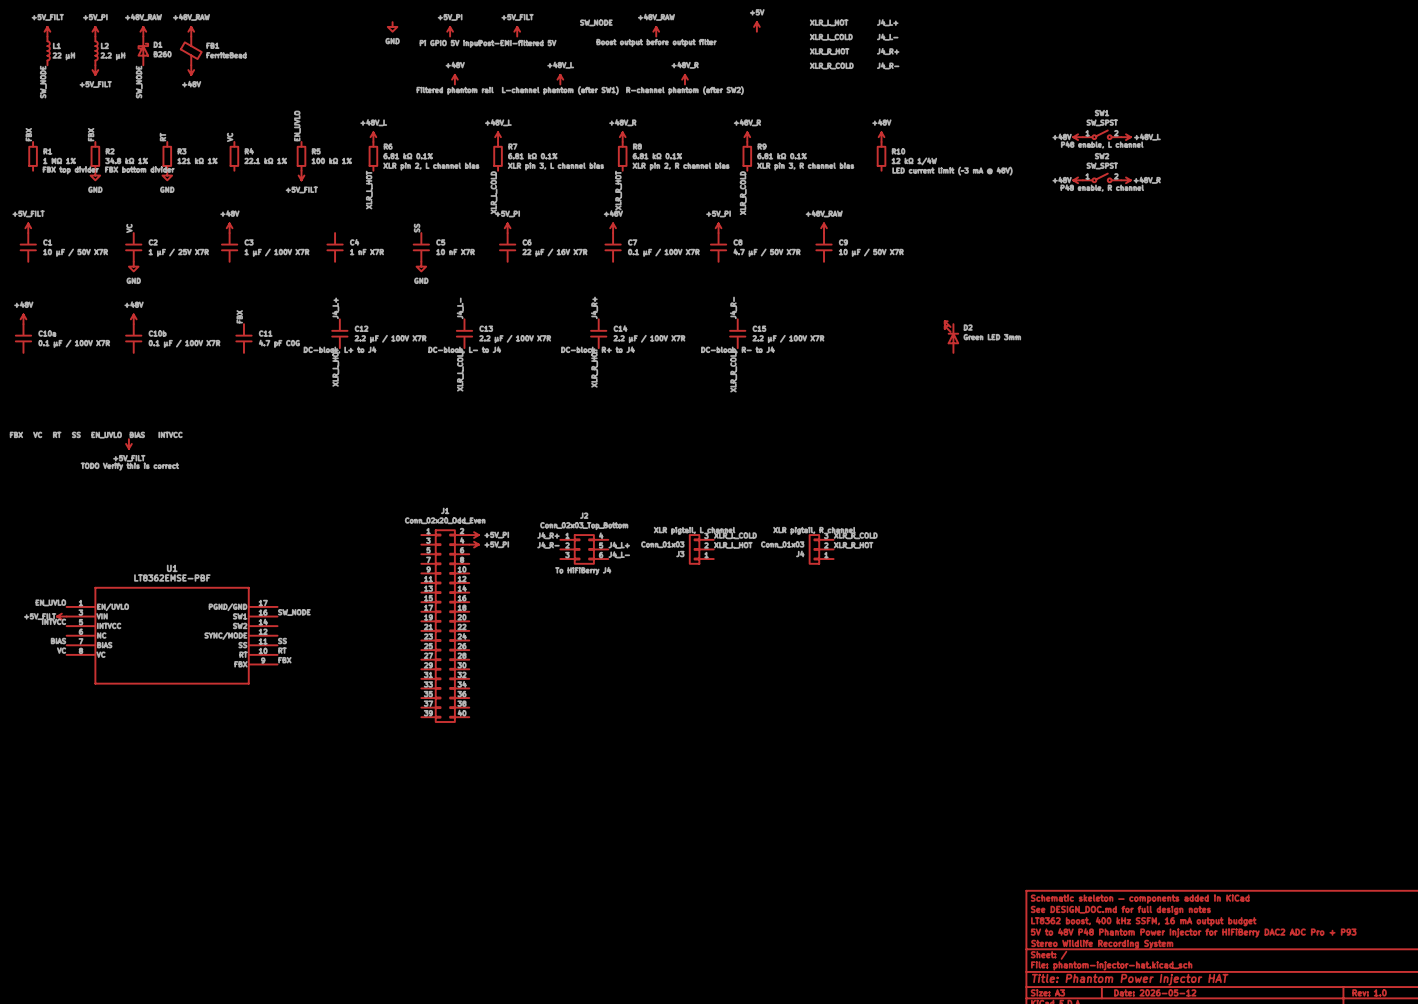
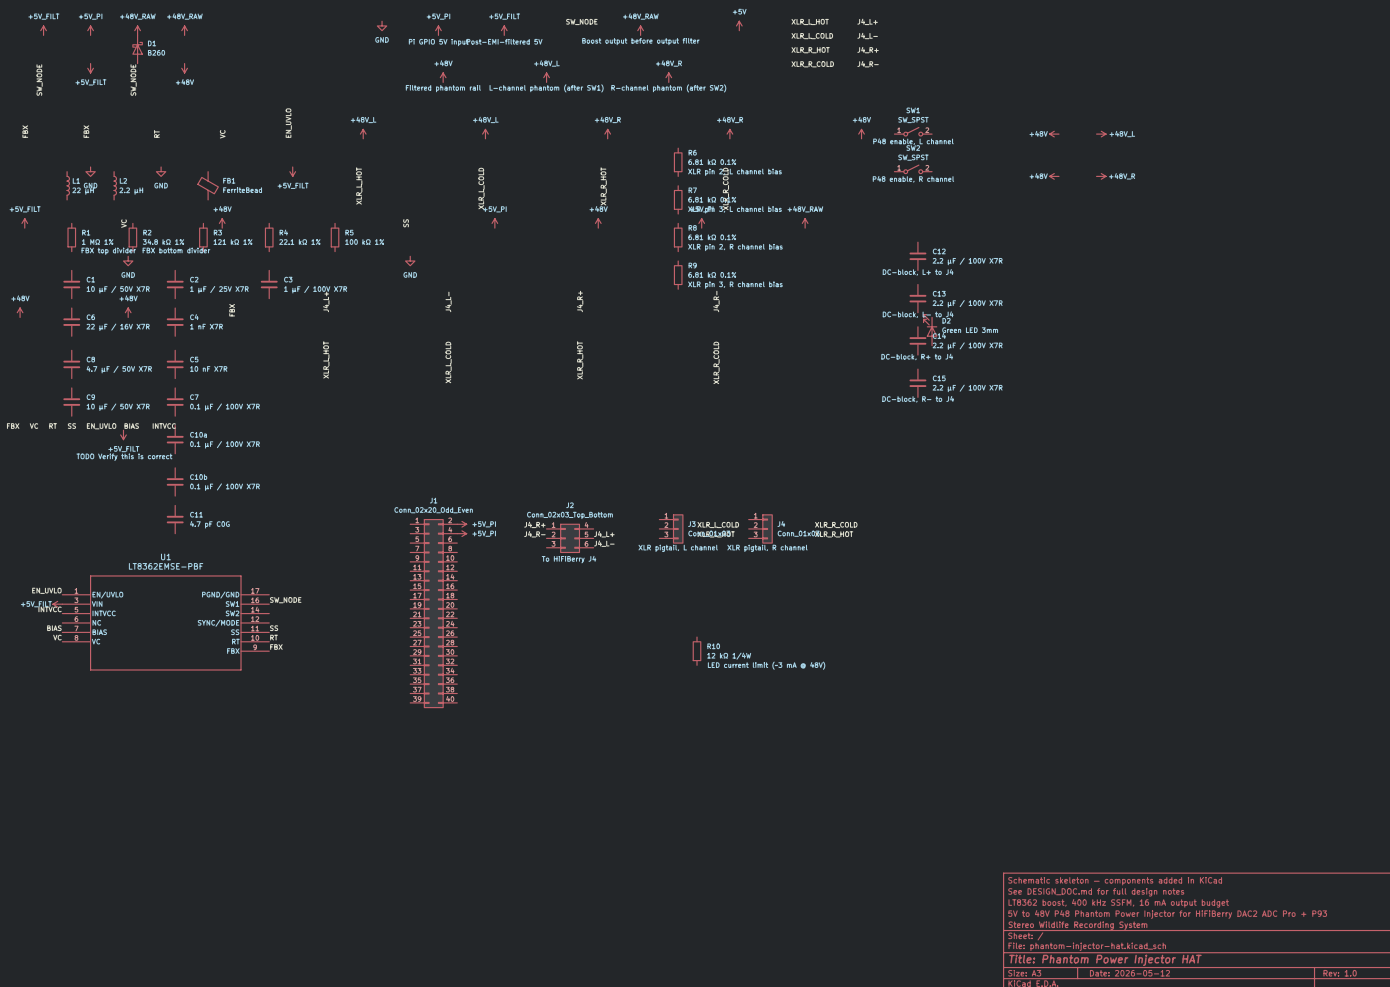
part position: (48, 50) -> (68, 185)
part position: (96, 50) -> (115, 185)
part position: (191, 50) -> (208, 185)
part position: (1102, 134) -> (913, 131)
part position: (33, 156) -> (71, 237)
part position: (95, 156) -> (132, 237)
part position: (167, 156) -> (203, 237)
part position: (234, 156) -> (269, 237)
part position: (301, 156) -> (335, 237)
part position: (373, 156) -> (678, 162)
part position: (498, 156) -> (678, 199)
part position: (622, 156) -> (678, 237)
part position: (747, 156) -> (678, 275)
part position: (881, 156) -> (697, 651)
part position: (1102, 177) -> (913, 169)
part position: (28, 247) -> (71, 284)
part position: (133, 247) -> (175, 284)
part position: (229, 247) -> (269, 284)
part position: (335, 247) -> (175, 322)
part position: (421, 247) -> (175, 364)
part position: (507, 247) -> (71, 322)
part position: (613, 247) -> (175, 402)
part position: (718, 247) -> (71, 364)
part position: (824, 247) -> (71, 402)
part position: (339, 333) -> (917, 256)
part position: (464, 333) -> (917, 298)
part position: (598, 333) -> (917, 340)
part position: (737, 333) -> (917, 383)
part position: (23, 338) -> (175, 439)
part position: (133, 338) -> (175, 481)
part position: (243, 338) -> (175, 519)
part rotation: 0° (694, 549) -> 180° (678, 528)
part rotation: 0° (814, 549) -> 180° (767, 528)
part position: (821, 549) -> (760, 528)

